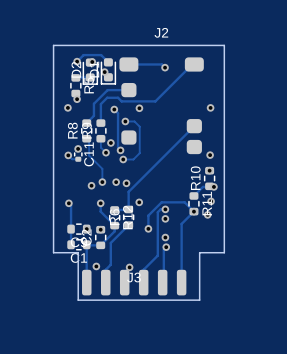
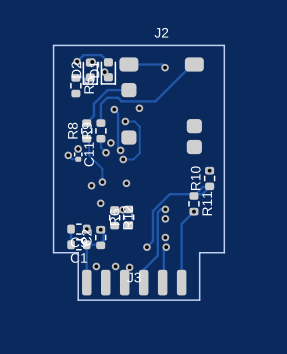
via: (77, 99) -> none
via: (67, 107) -> none
via: (210, 107) -> none
track: (194, 126) (128, 191) (128, 209) (114, 209) -> none
via: (210, 155) -> none
via: (116, 182) -> none
via: (213, 186) -> none
via: (211, 201) -> none
via: (139, 202) -> none
track: (161, 202) (184, 202) (193, 211) -> (161, 202) (169, 194) (202, 194) (212, 184)
track: (68, 203) (71, 205) (71, 229) -> none
via: (68, 203) -> none
track: (100, 203) (100, 211) (114, 225) (114, 231) (100, 245) (86, 244) -> (103, 232) (103, 239) (98, 244) (86, 244)
via: none -> (122, 209)
track: (152, 211) (148, 215) (148, 228) -> (152, 211) (152, 241) (146, 247)
via: (207, 214) -> none
track: (128, 225) (110, 242) (110, 264) (105, 269) (105, 282) -> none
via: (148, 228) -> none
via: none -> (146, 247)
via: none -> (115, 266)

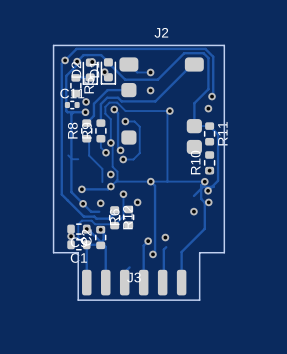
via: none -> (65, 60)
track: none -> (80, 61) (66, 75) (66, 111) (85, 112)
track: none -> (108, 62) (125, 79) (157, 79) (184, 53) (203, 53) (208, 58) (208, 89) (194, 103) (194, 126) (209, 126) (218, 134) (218, 180) (208, 190)
track: (128, 64) (161, 64) (165, 67) -> none
via: (165, 67) -> none
track: none -> (134, 69) (137, 72) (150, 72)
via: none -> (150, 72)
via: none -> (150, 90)
track: none -> (212, 96) (213, 56) (205, 48) (76, 48) (61, 63) (61, 194) (83, 216) (109, 218) (114, 213)
via: none -> (212, 96)
via: none -> (86, 101)
via: (139, 108) -> none
via: none -> (208, 108)
via: none -> (169, 111)
track: none -> (73, 112) (71, 114) (71, 192) (91, 211) (99, 211)
via: none -> (85, 112)
via: (78, 148) -> none
C11 rotation: 0° (78, 154) -> 90° clockwise (72, 105)
C11 position: (78, 154) -> (72, 105)
via: (68, 155) -> none
via: none -> (110, 174)
R10 position: (209, 178) -> (209, 162)
track: none -> (115, 181) (204, 181)
track: none -> (150, 181) (155, 185) (155, 252) (152, 254)
via: none -> (150, 181)
track: none -> (167, 181) (167, 113) (169, 111) (125, 111) (117, 102) (109, 102) (105, 106) (105, 113) (110, 119) (112, 166) (117, 171) (117, 180) (108, 189) (81, 189)
track: none -> (204, 181) (201, 185) (201, 198) (204, 202)
via: none -> (204, 181)
via: (102, 182) -> none
via: (126, 183) -> none
track: (212, 184) (202, 194) (169, 194) (152, 211) (152, 241) (146, 247) -> none
via: (91, 185) -> none
via: none -> (110, 186)
via: none -> (81, 189)
via: none -> (208, 190)
track: none -> (123, 194) (123, 216) (115, 224) (95, 224) (91, 220) (81, 220) (78, 224) (78, 237) (86, 244)
via: none -> (123, 194)
via: none -> (137, 202)
via: none -> (208, 202)
via: none -> (83, 203)
R11 position: (193, 203) -> (209, 133)
via: (122, 209) -> none
track: (165, 209) (160, 209) (157, 212) (157, 255) (143, 269) -> (148, 241) (143, 245) (143, 269)
via: (165, 209) -> none
track: (193, 211) (181, 223) (181, 252) -> (204, 202) (204, 228) (181, 252)
via: (165, 218) -> none
track: none -> (87, 229) (105, 246) (105, 282)
via: none -> (71, 236)
via: none -> (148, 241)
via: (146, 247) -> none
via: (166, 247) -> none
via: none -> (152, 254)
via: (96, 266) -> none
via: (115, 266) -> none
via: (129, 267) -> none

